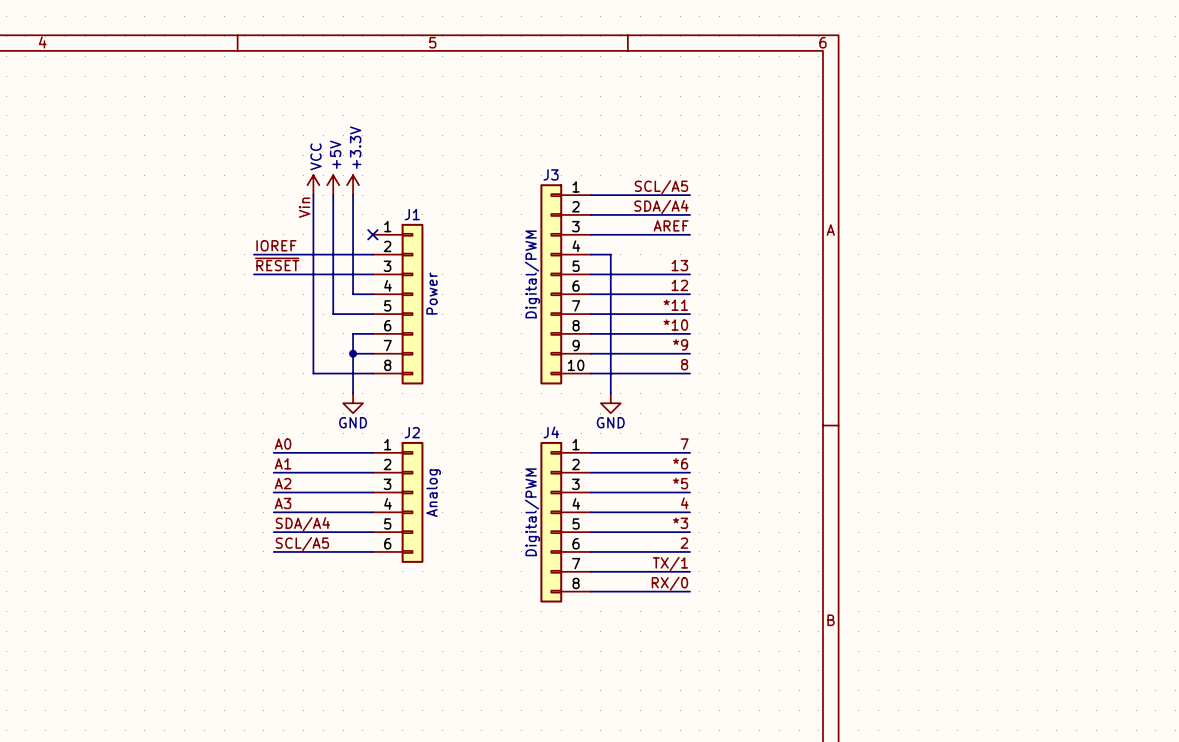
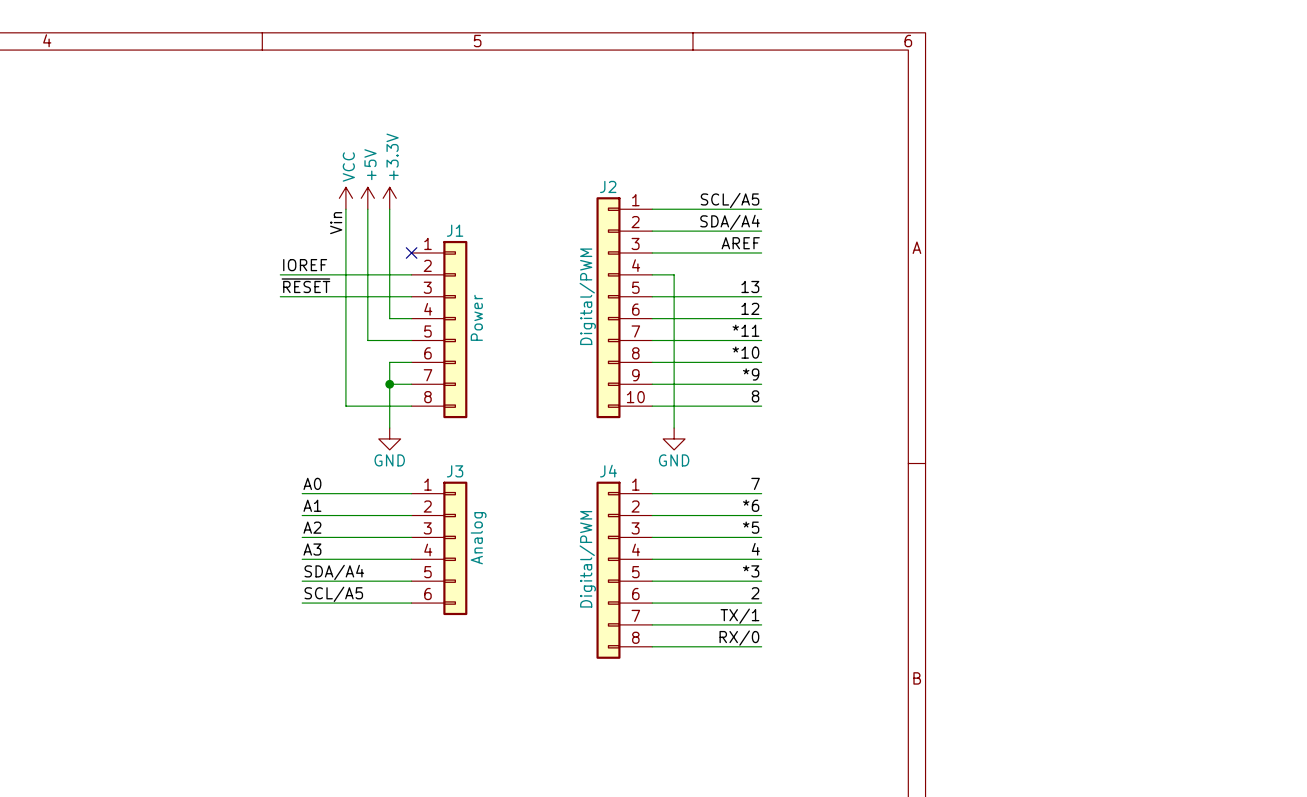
J3 name: J3 (551, 174) -> J2 (608, 186)
J2 name: J2 (412, 432) -> J3 (455, 471)

